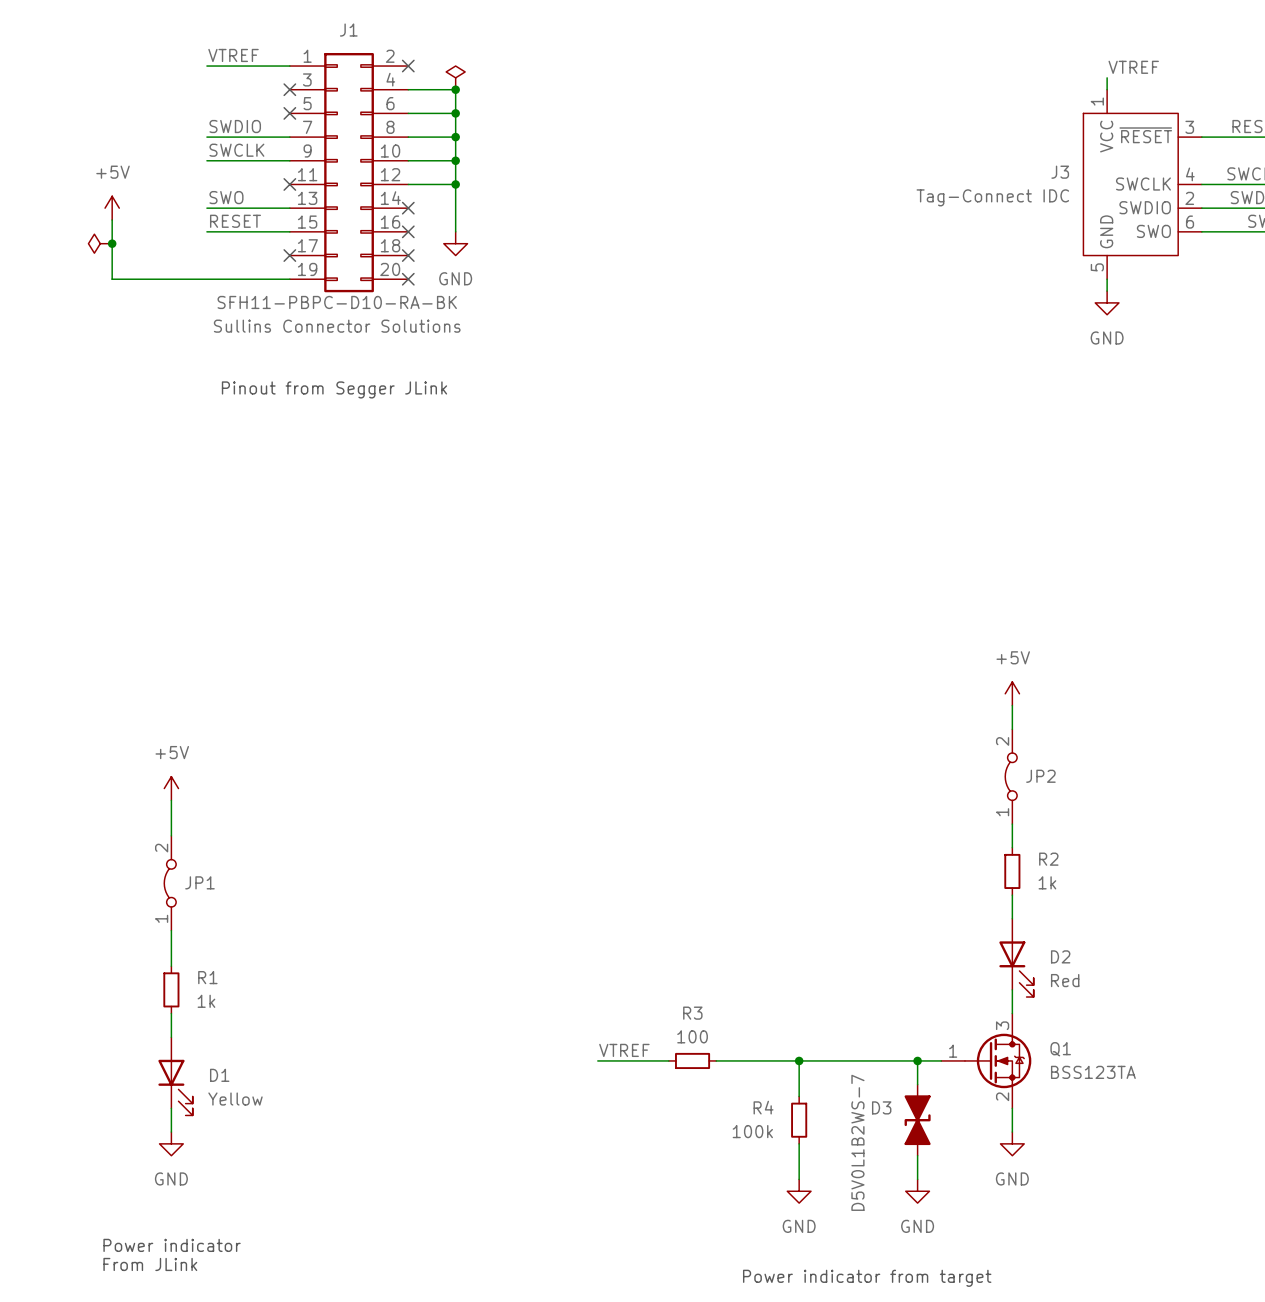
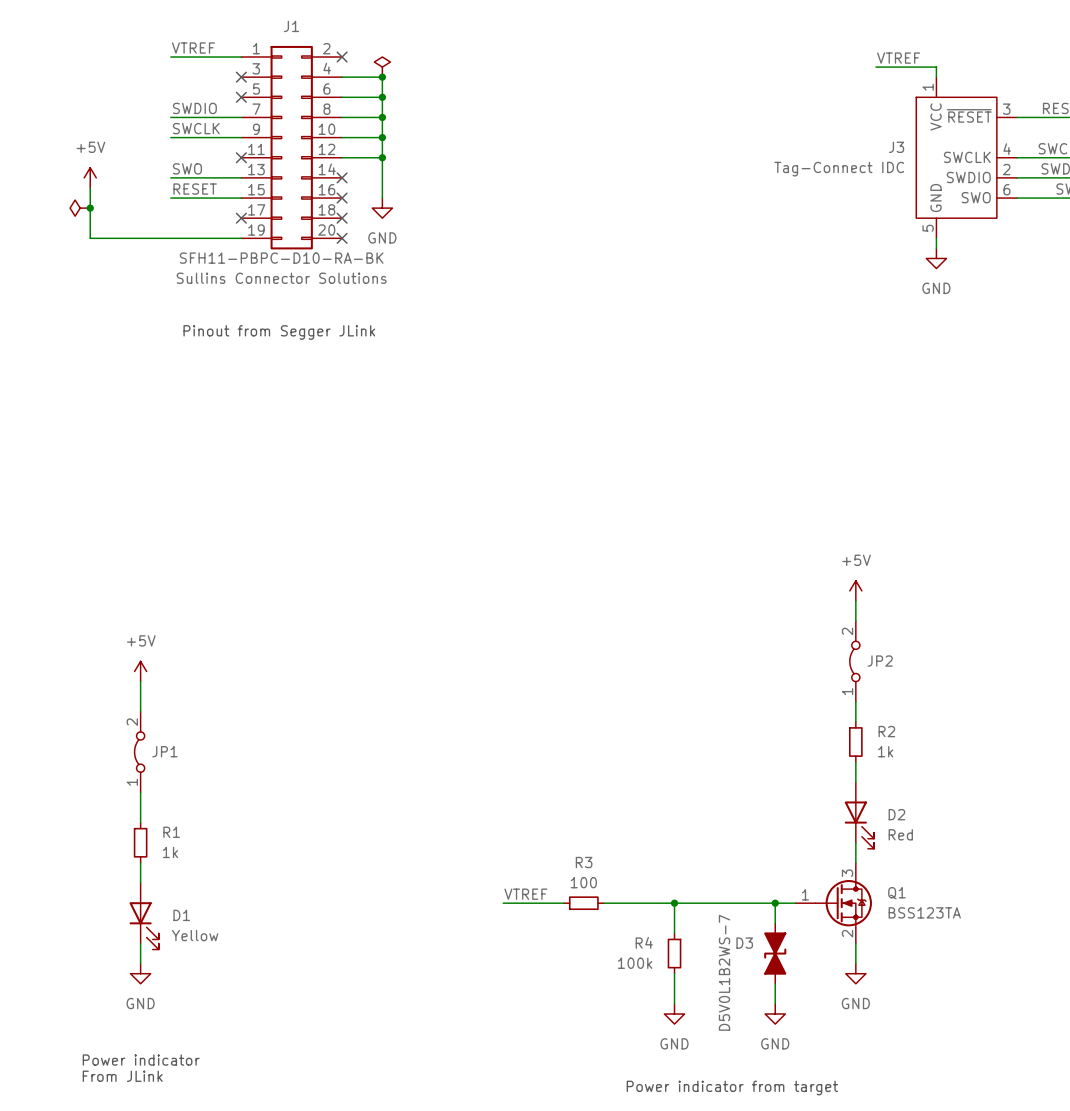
label position: VTREF (1133, 67) -> VTREF (898, 58)
wire: none -> (875, 67) (936, 67)

